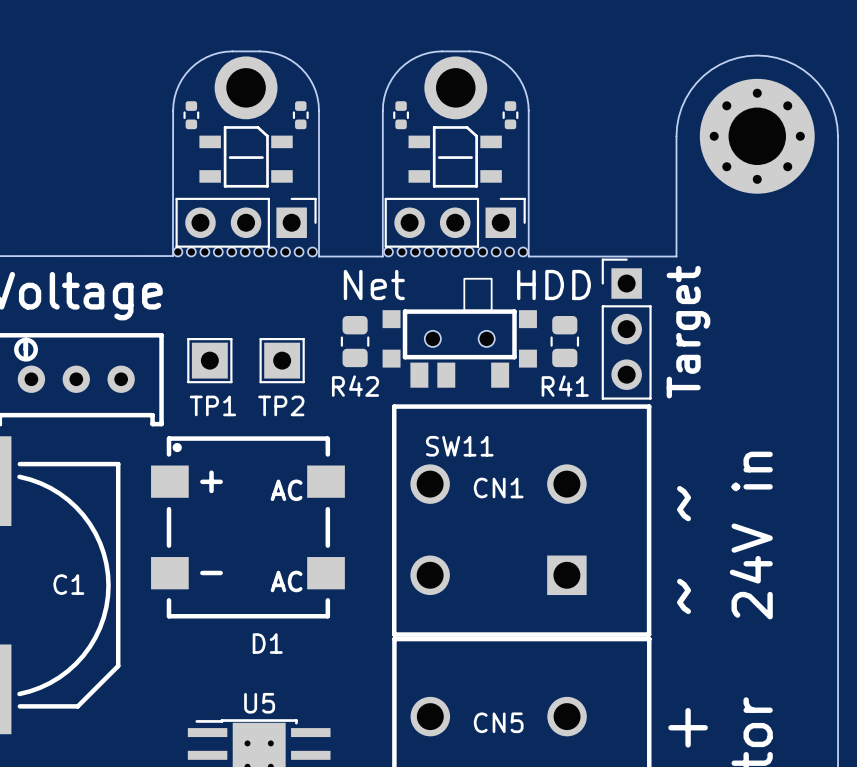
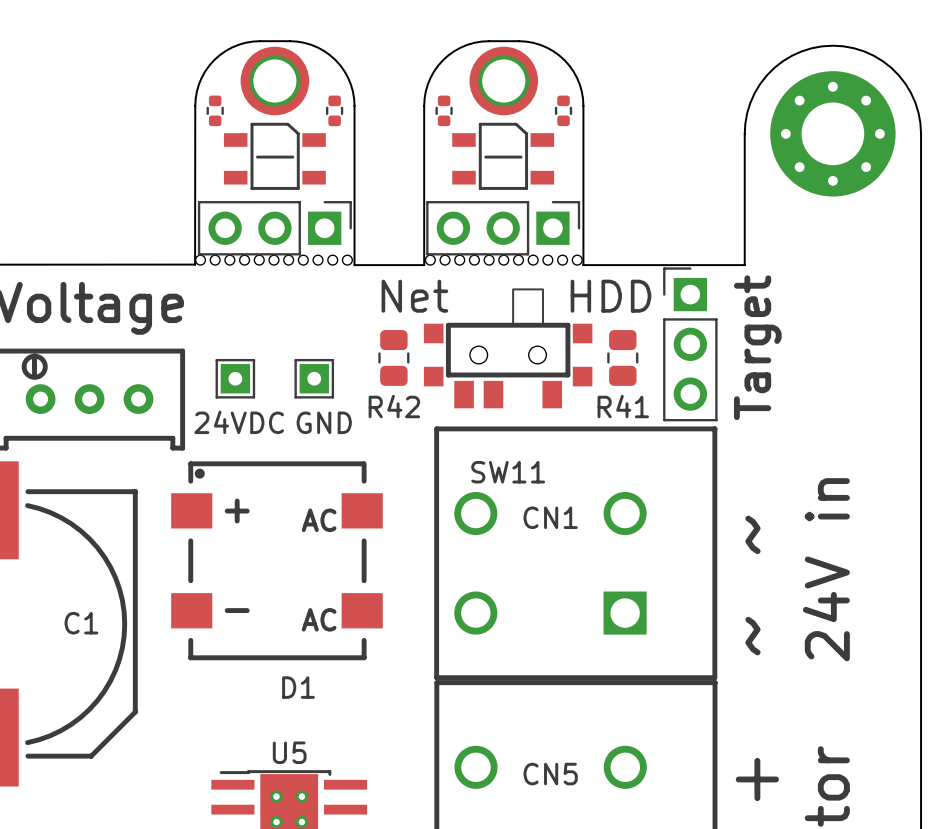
TP1: (209, 360) -> none
part: none -> (235, 378)
TP2: (282, 360) -> none
part: none -> (314, 378)

